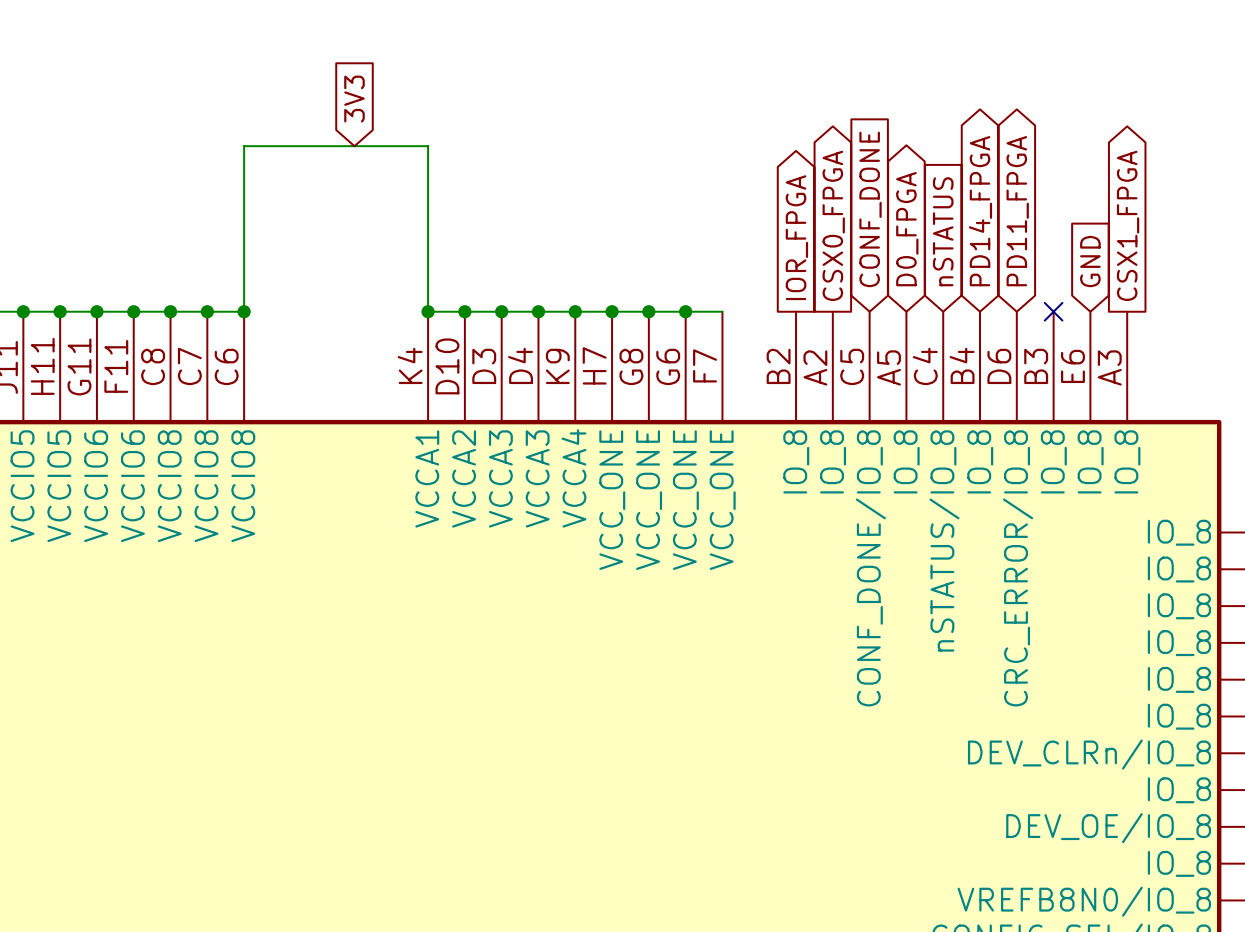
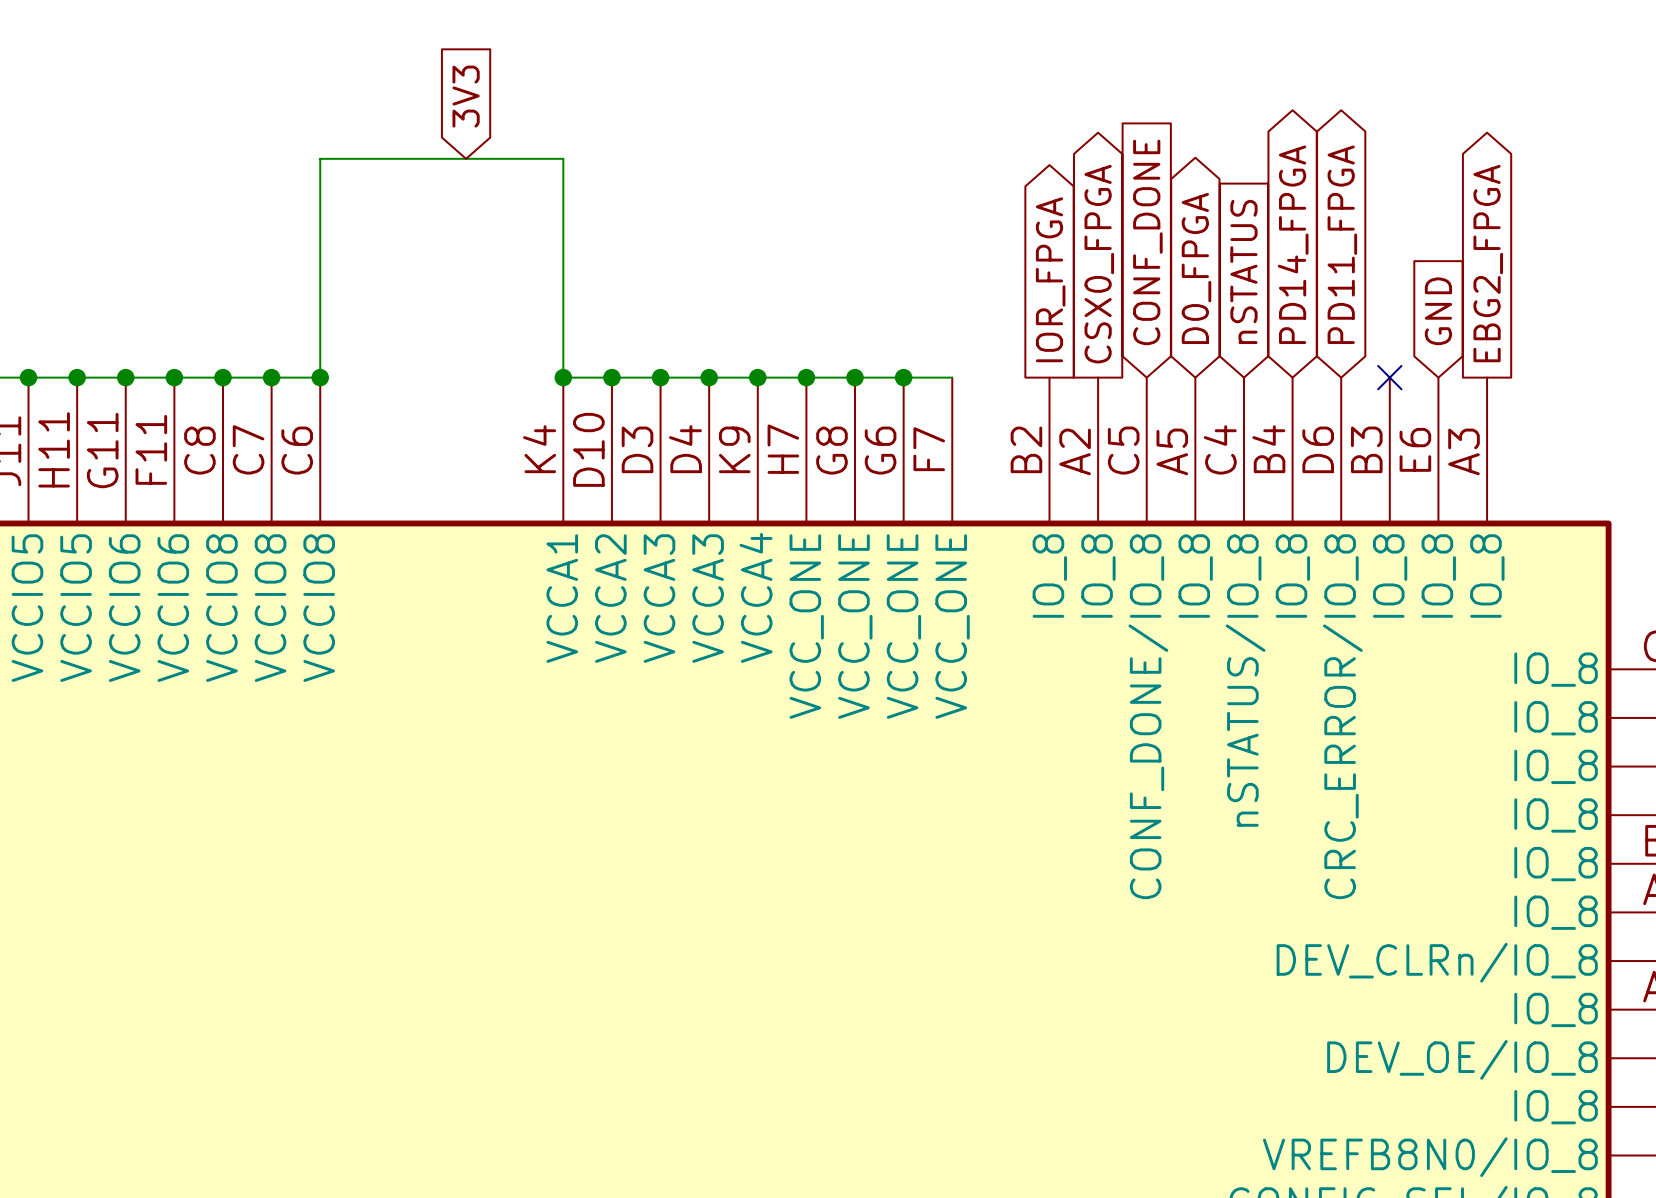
global label: CSX1_FPGA (1128, 225) -> EBG2_FPGA (1488, 263)

